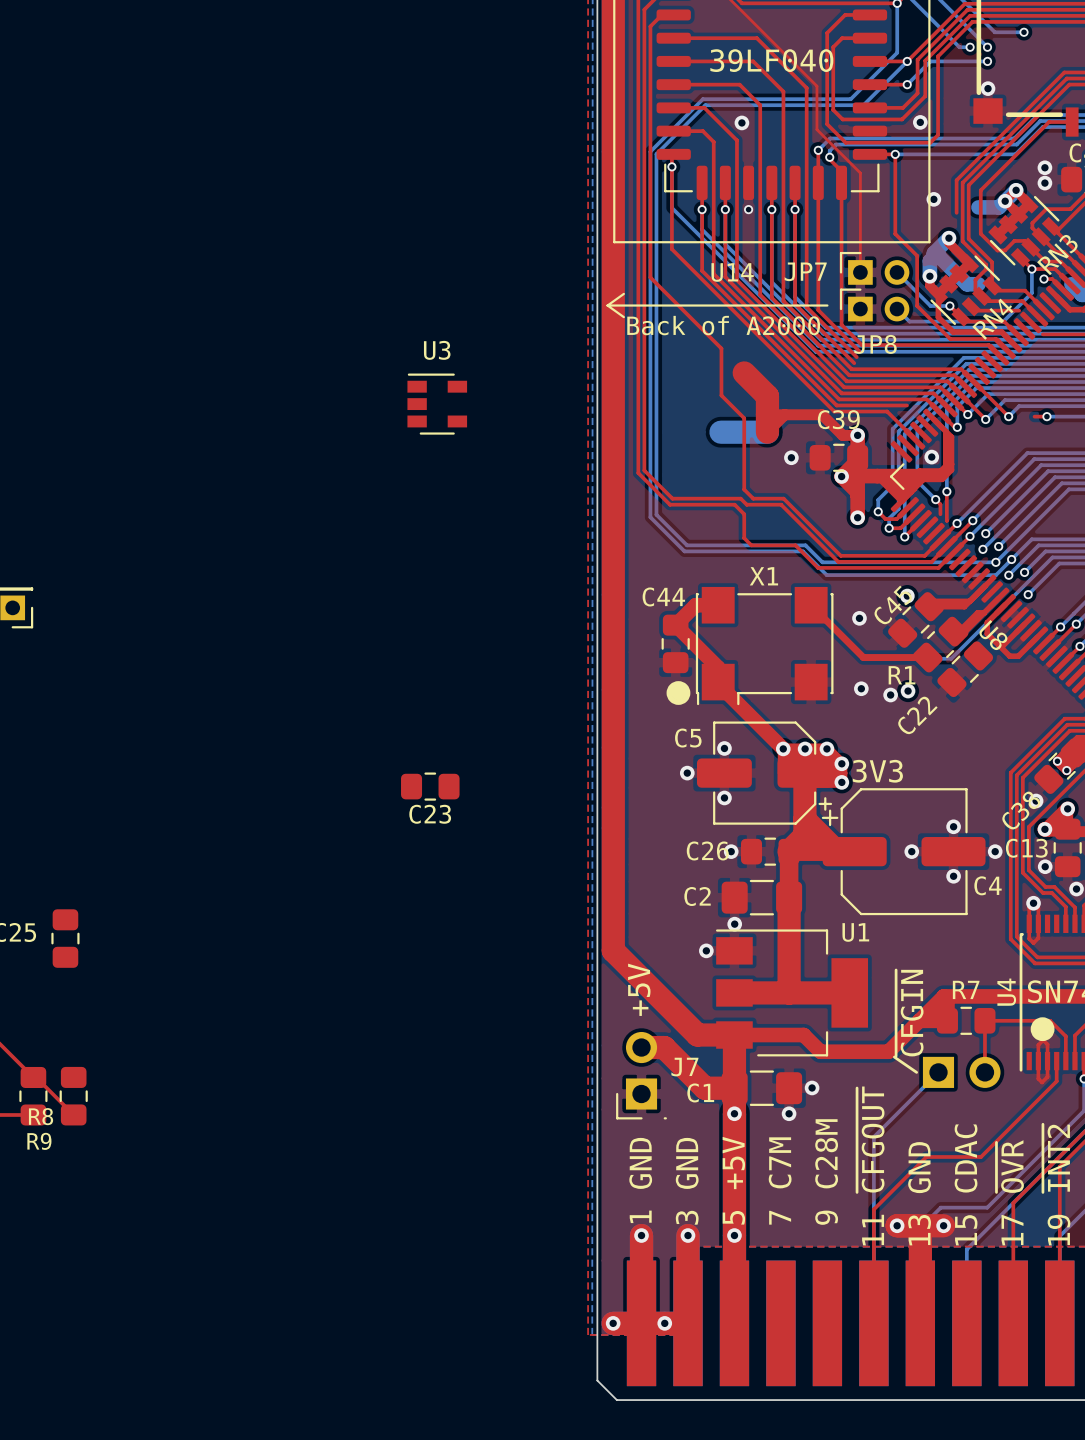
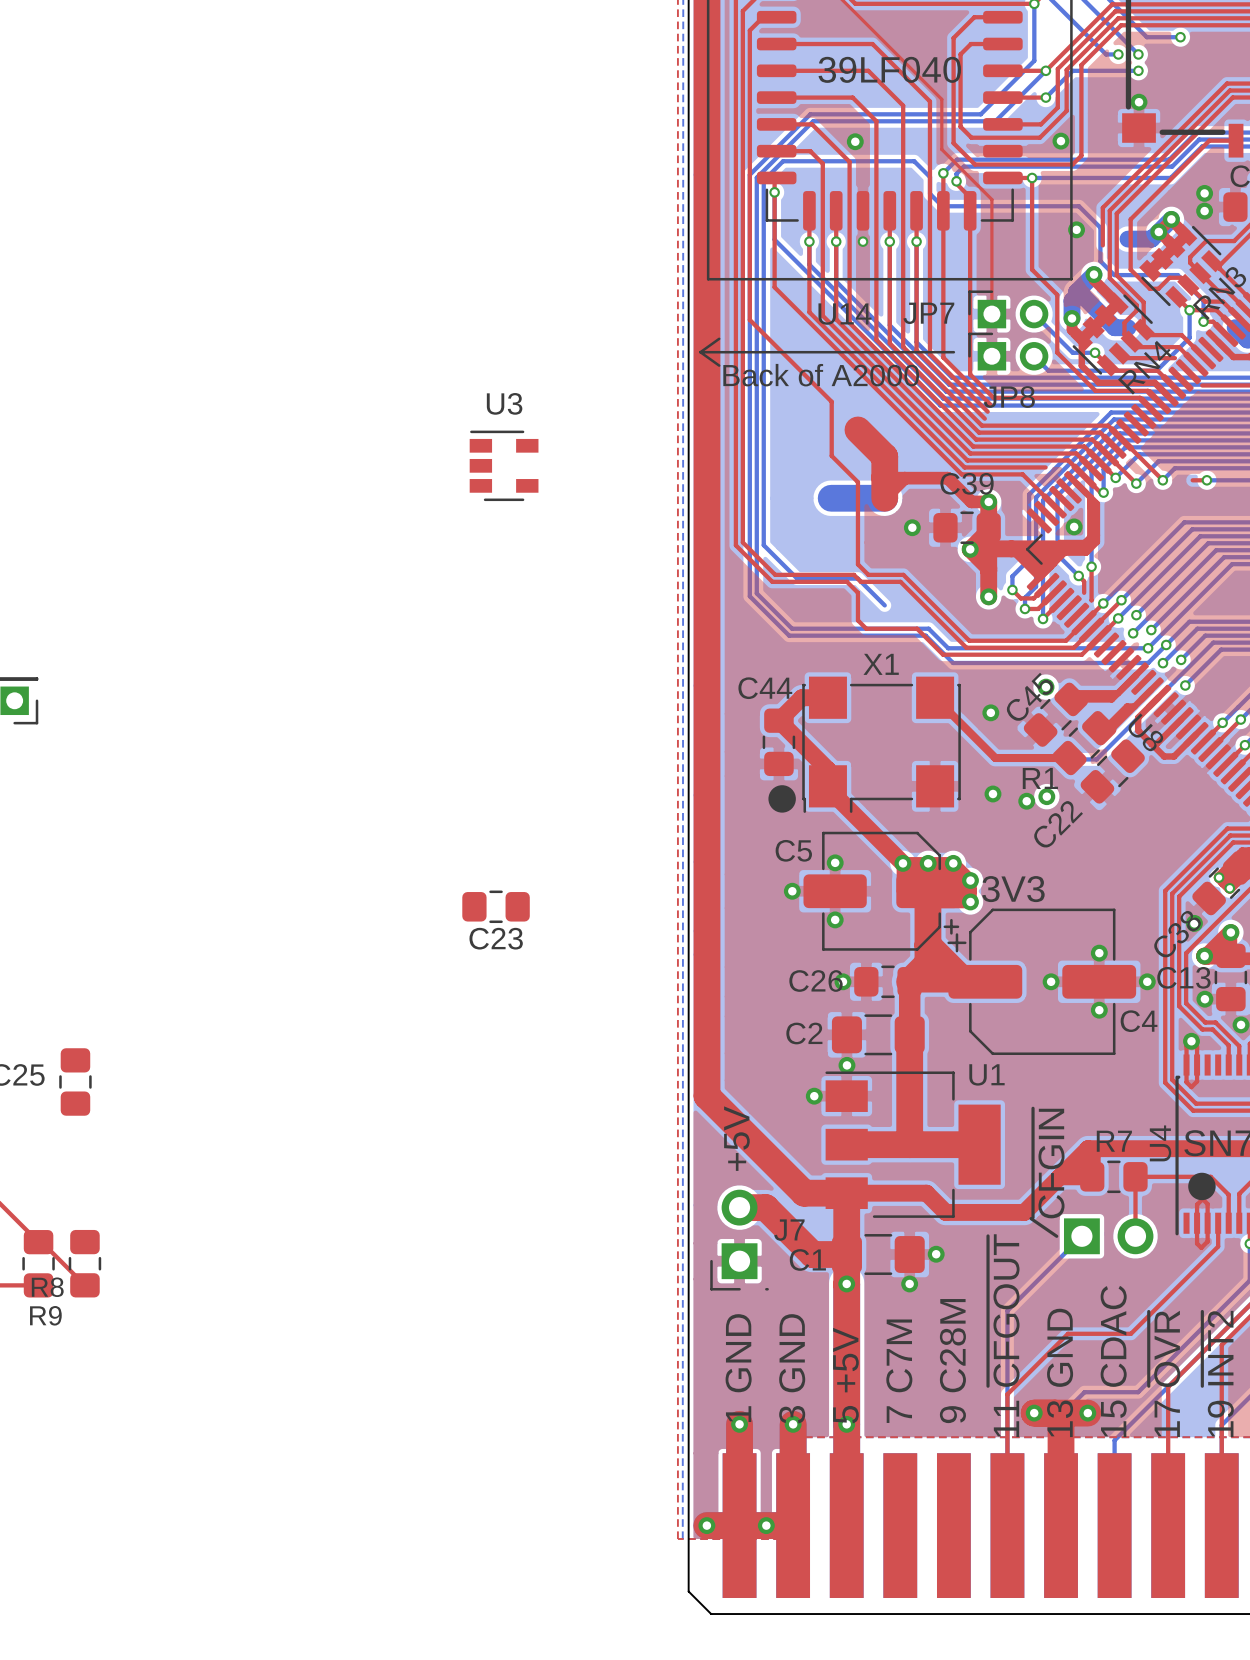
bottom track: none -> (1203, 321) (1203, 300) (1177, 275) (1114, 275) (1100, 261) (1100, 227) (1078, 206) (942, 206) (930, 193) (930, 177) (914, 161) (783, 161) (763, 180) (763, 545) (797, 578) (857, 578) (884, 605)

